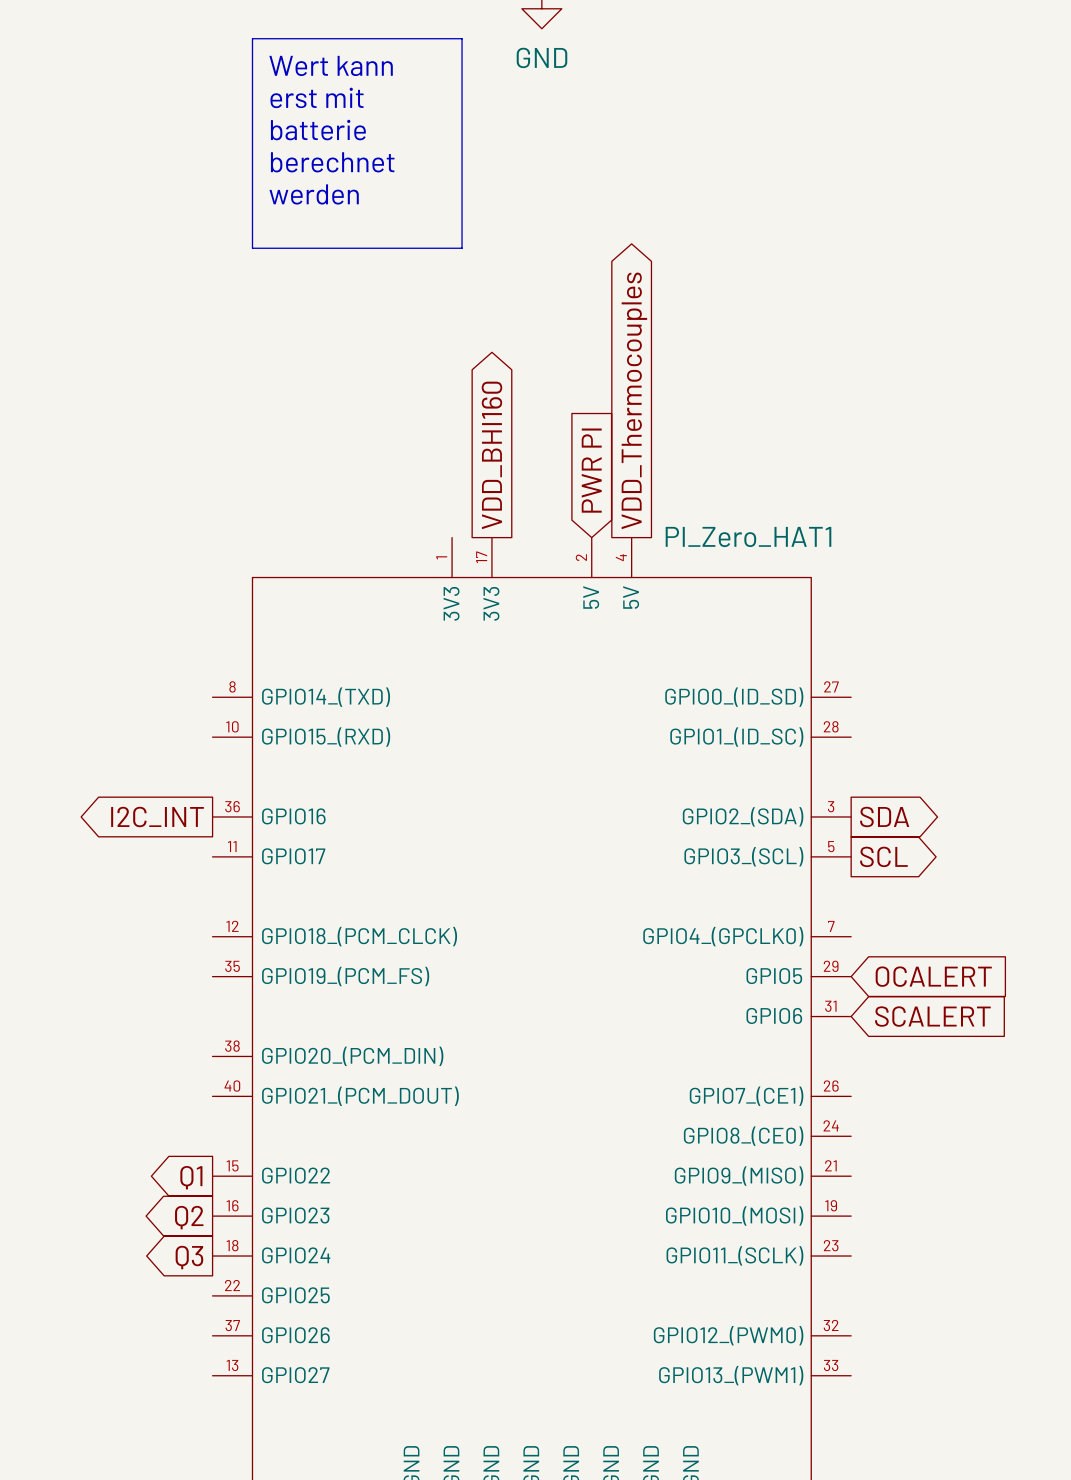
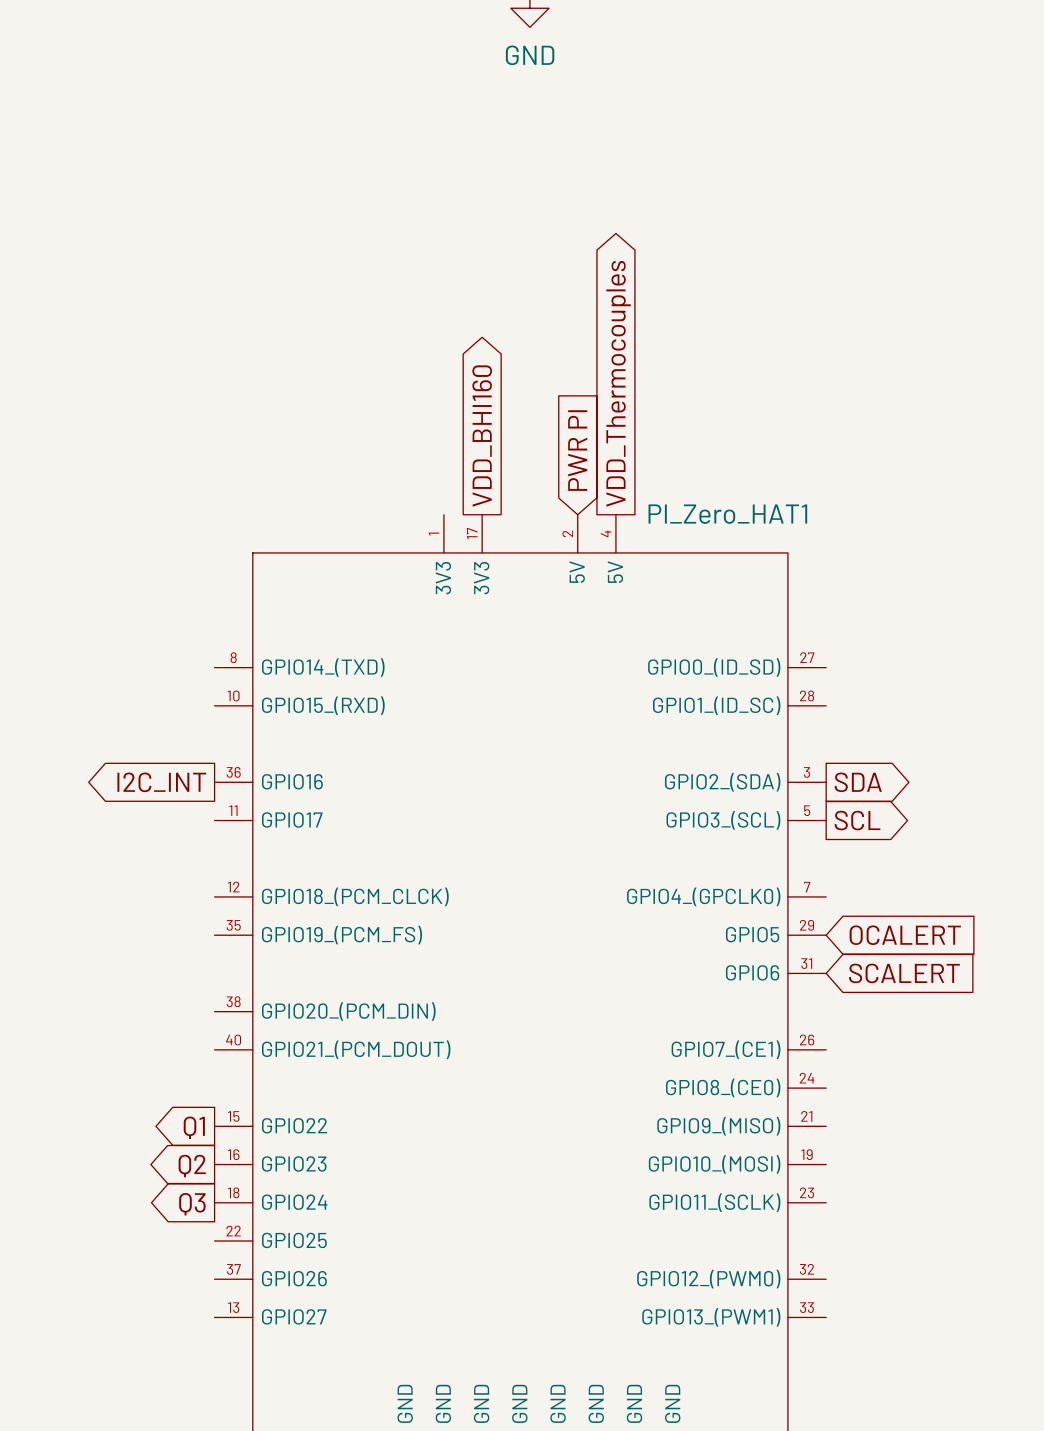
line: (252, 38) (462, 38) (462, 248) (252, 248) (252, 38) -> none
text: Wert kann (331, 65) -> none
text: erst mit (317, 97) -> none
text: batterie (318, 130) -> none
text: berechnet (332, 162) -> none
text: werden (314, 194) -> none

